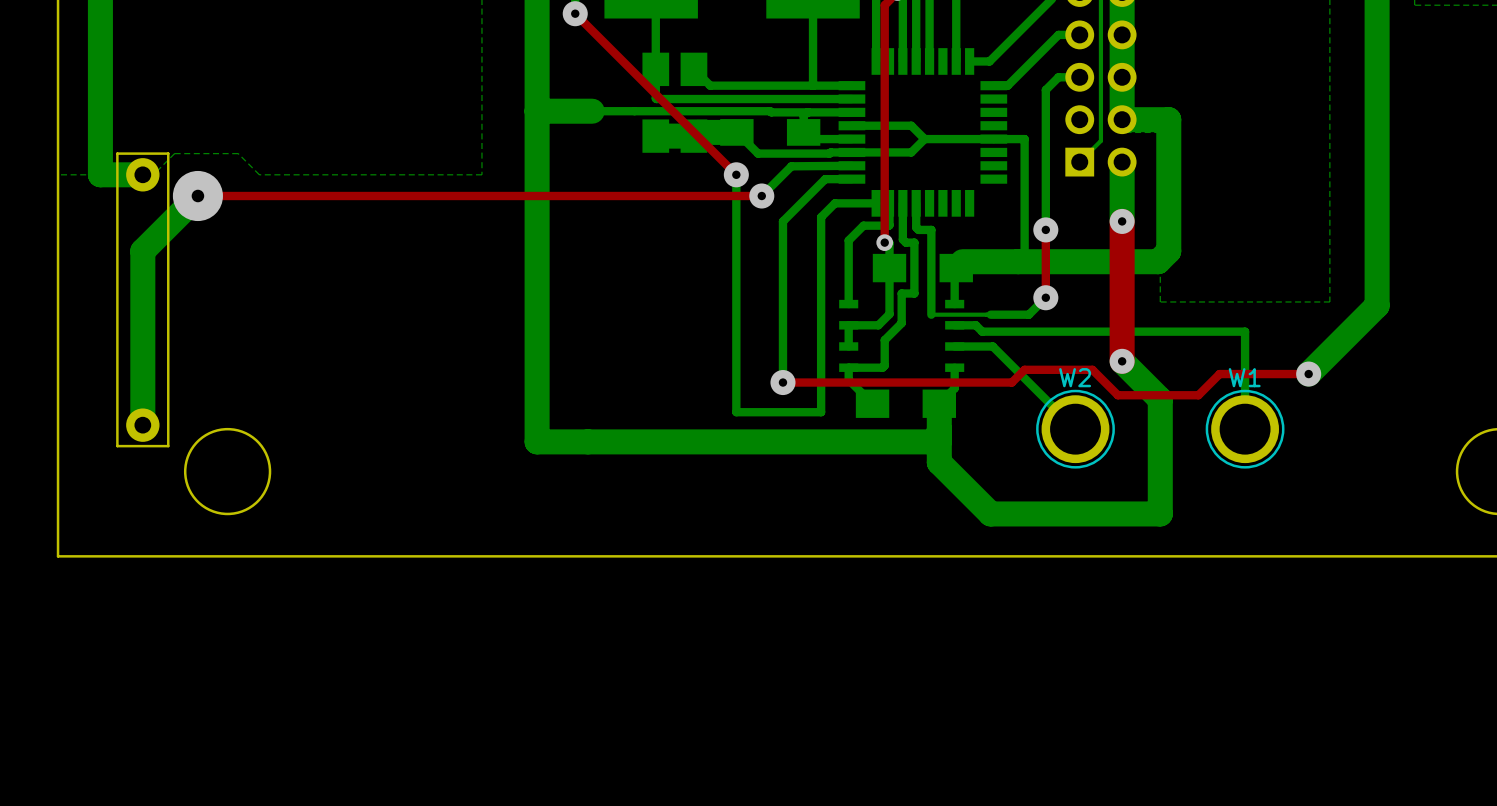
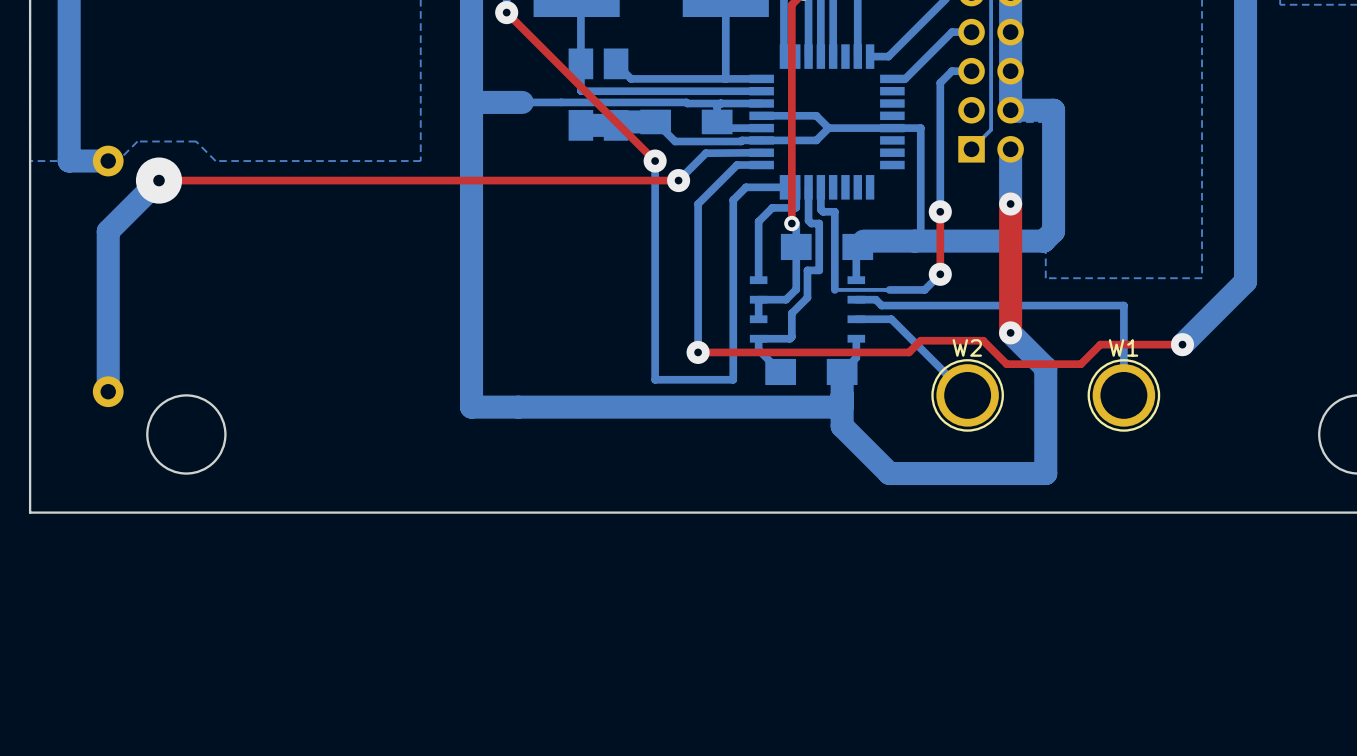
board edge: (117, 153) (117, 446) (168, 446) (168, 153) (117, 153) -> none

